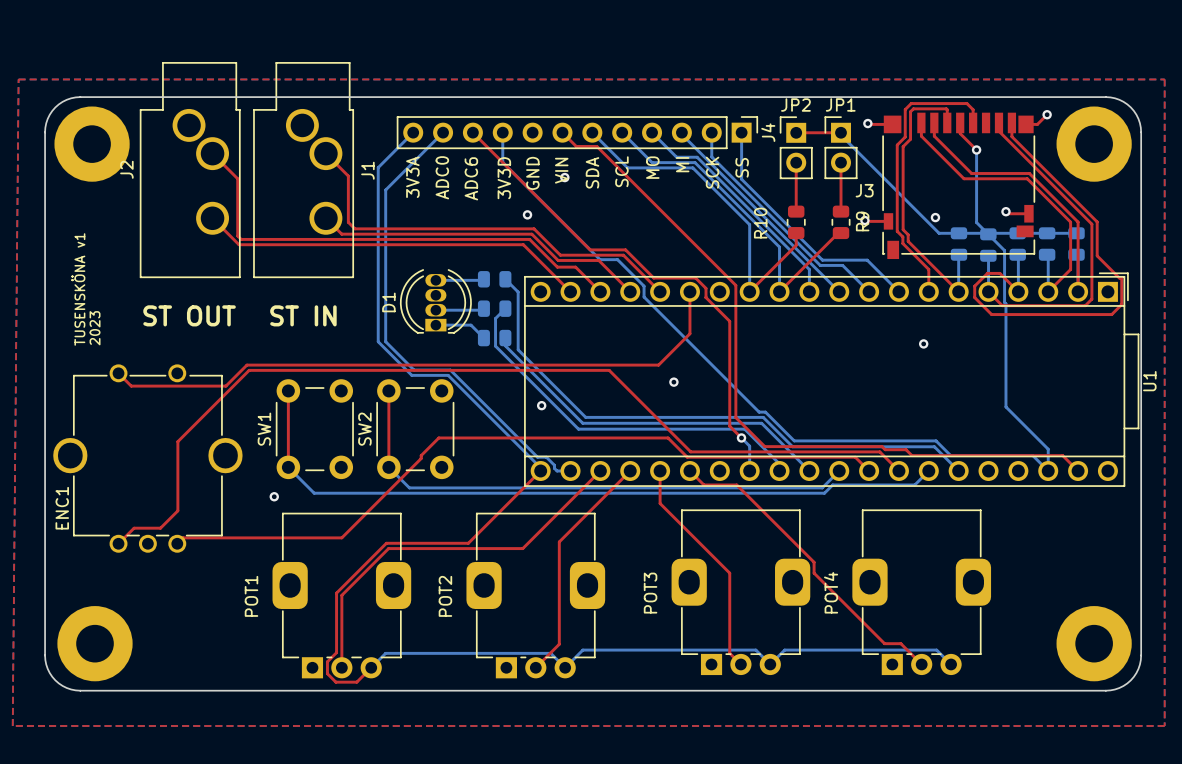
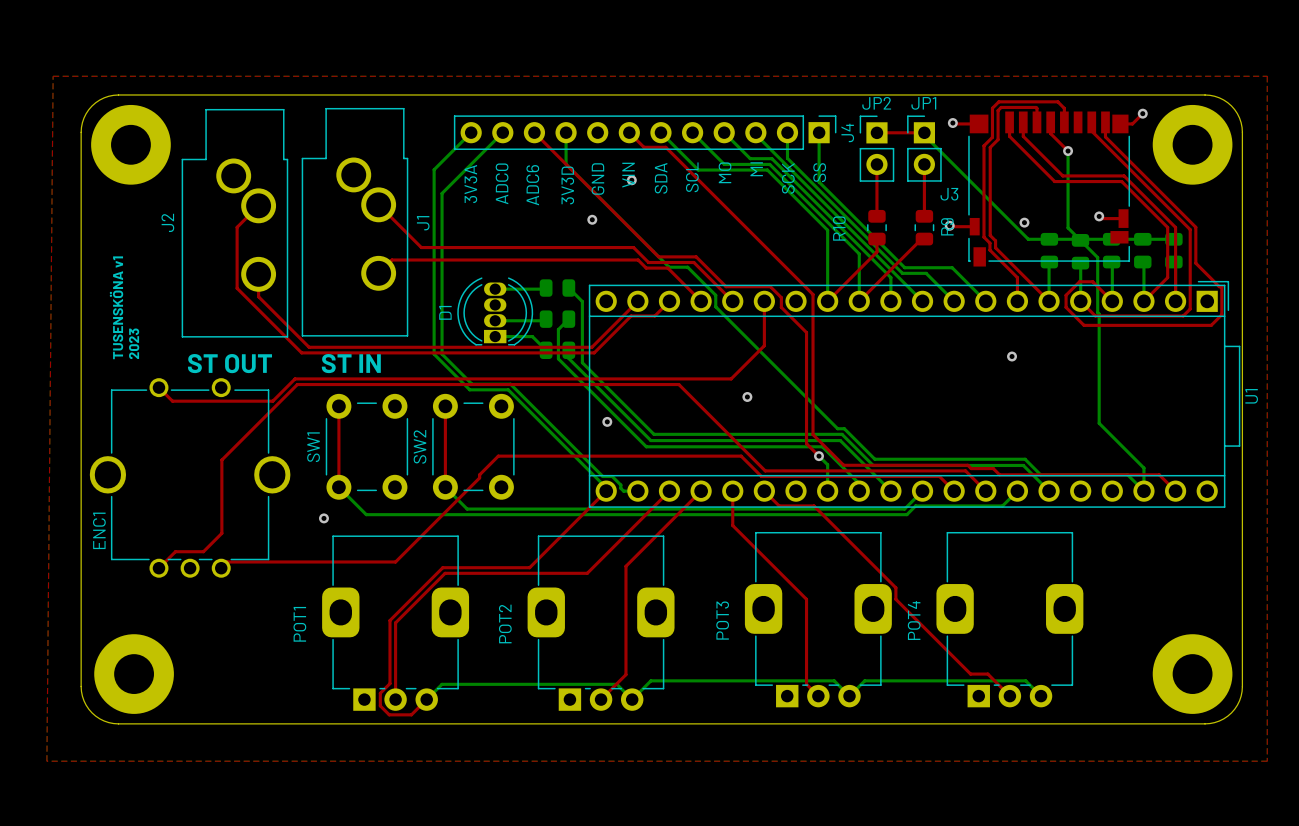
top track: (212, 153) (237, 178) (237, 235) (241, 239) (529, 239) (557, 267) (575, 267) (600, 291) -> (258, 205) (237, 227) (237, 288) (301, 352) (594, 352) (631, 315) (654, 315) (669, 301)
top track: (325, 153) (348, 176) (348, 222) (354, 228) (534, 228) (560, 255) (580, 255) -> (378, 204) (421, 247) (633, 247) (648, 262)
J2 position: (190, 170) -> (234, 223)
J1 position: (303, 170) -> (354, 222)
top track: (212, 218) (239, 244) (523, 244) (570, 291) -> (258, 274) (258, 296) (309, 347) (591, 347) (637, 301)
top track: (325, 218) (341, 234) (531, 234) (558, 260) (578, 260) -> (378, 273) (391, 260) (638, 260) (646, 268)
text position: ST OUT (189, 315) -> ST OUT (229, 363)
text position: ST IN (303, 315) -> ST IN (351, 363)

